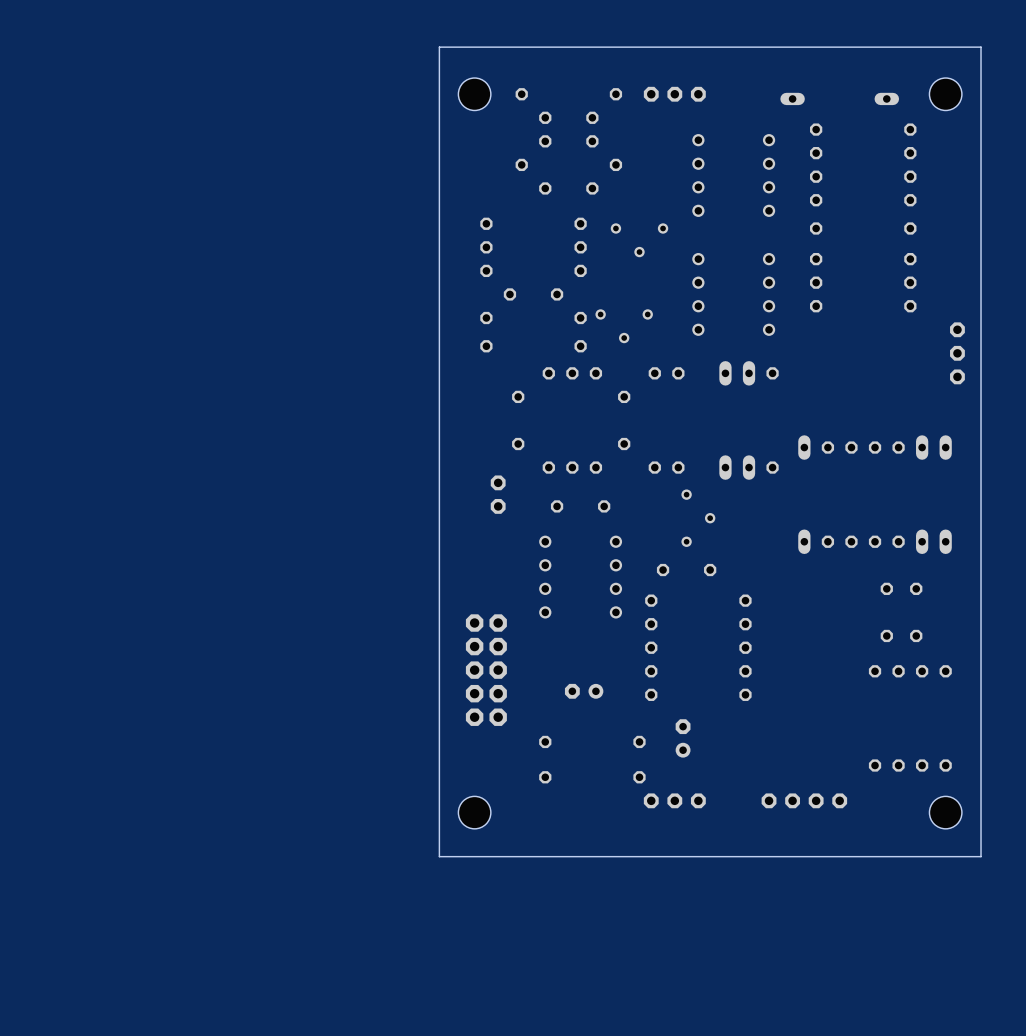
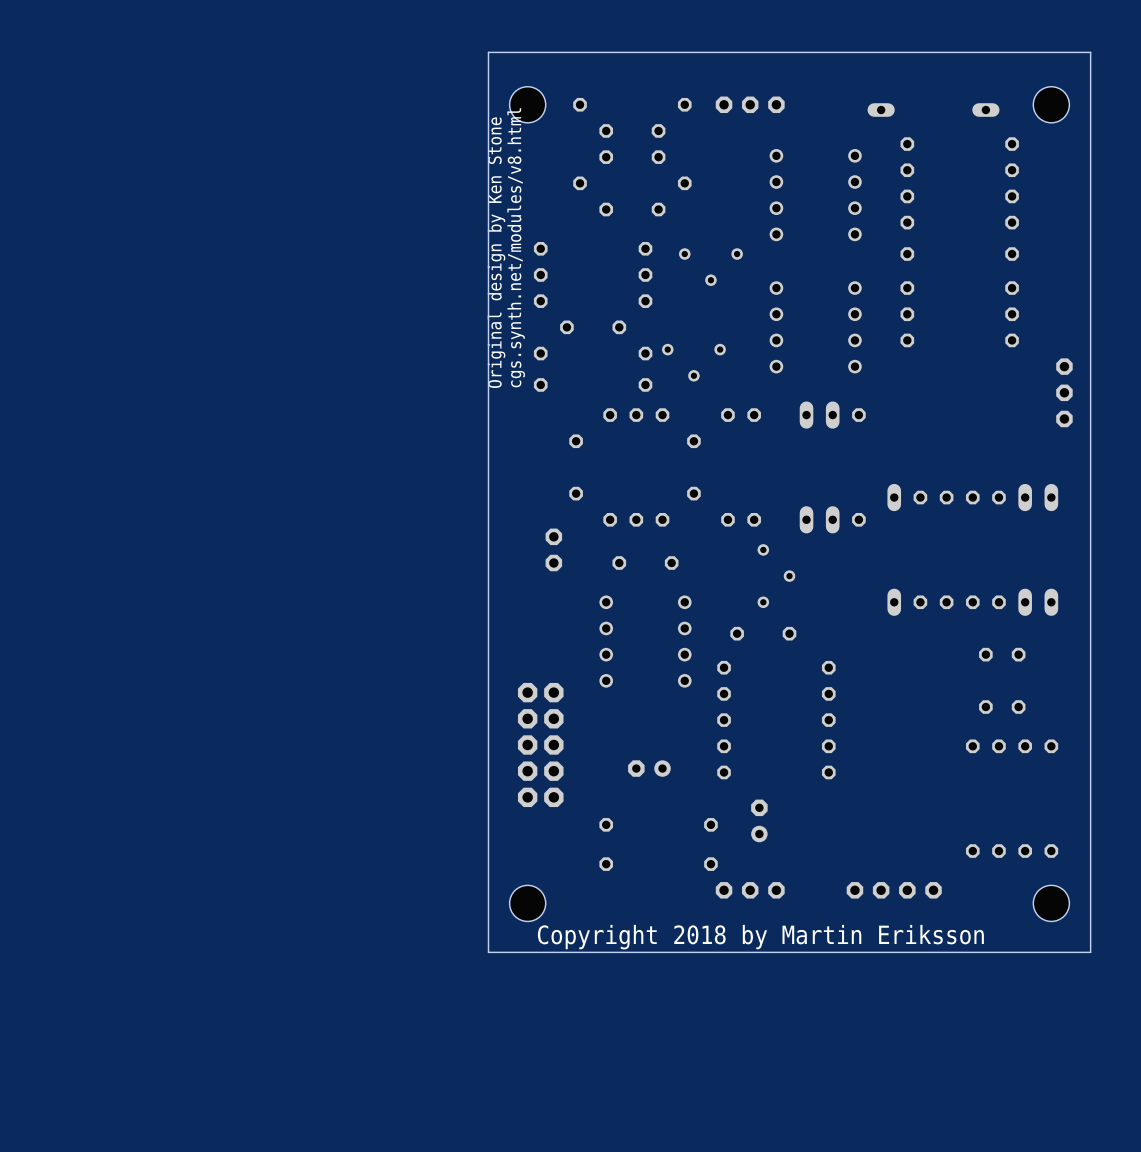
text: none -> cgs.synth.net/modules/v8.html (516, 247)
text: none -> Original design by Ken Stone (496, 252)
text: none -> Copyright 2018 by Martin Eriksson (760, 937)

